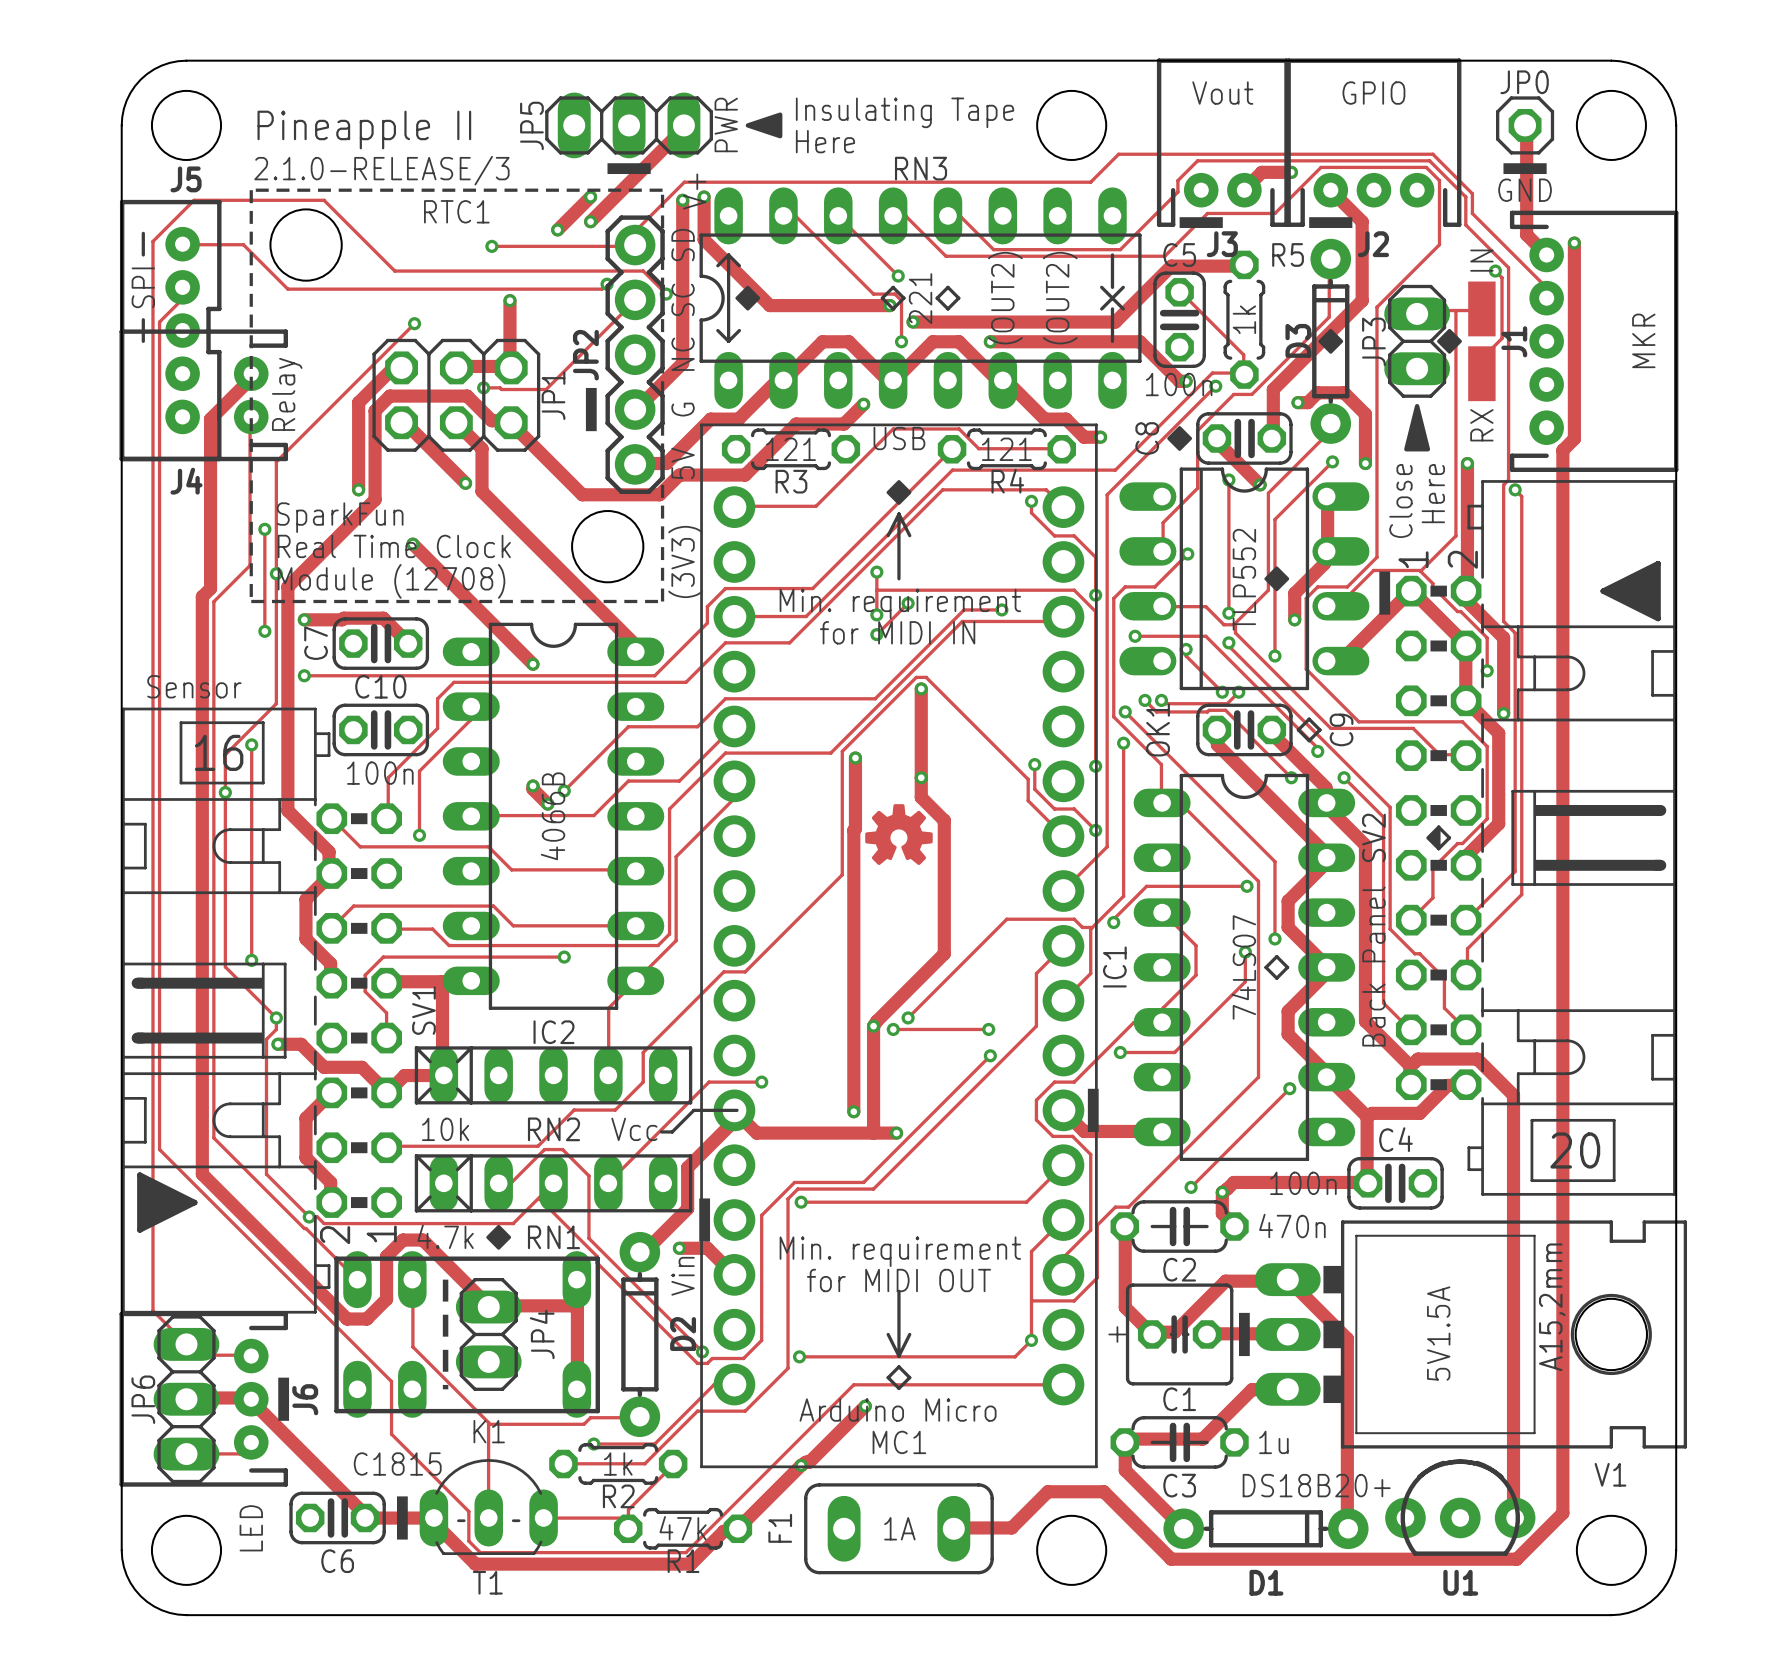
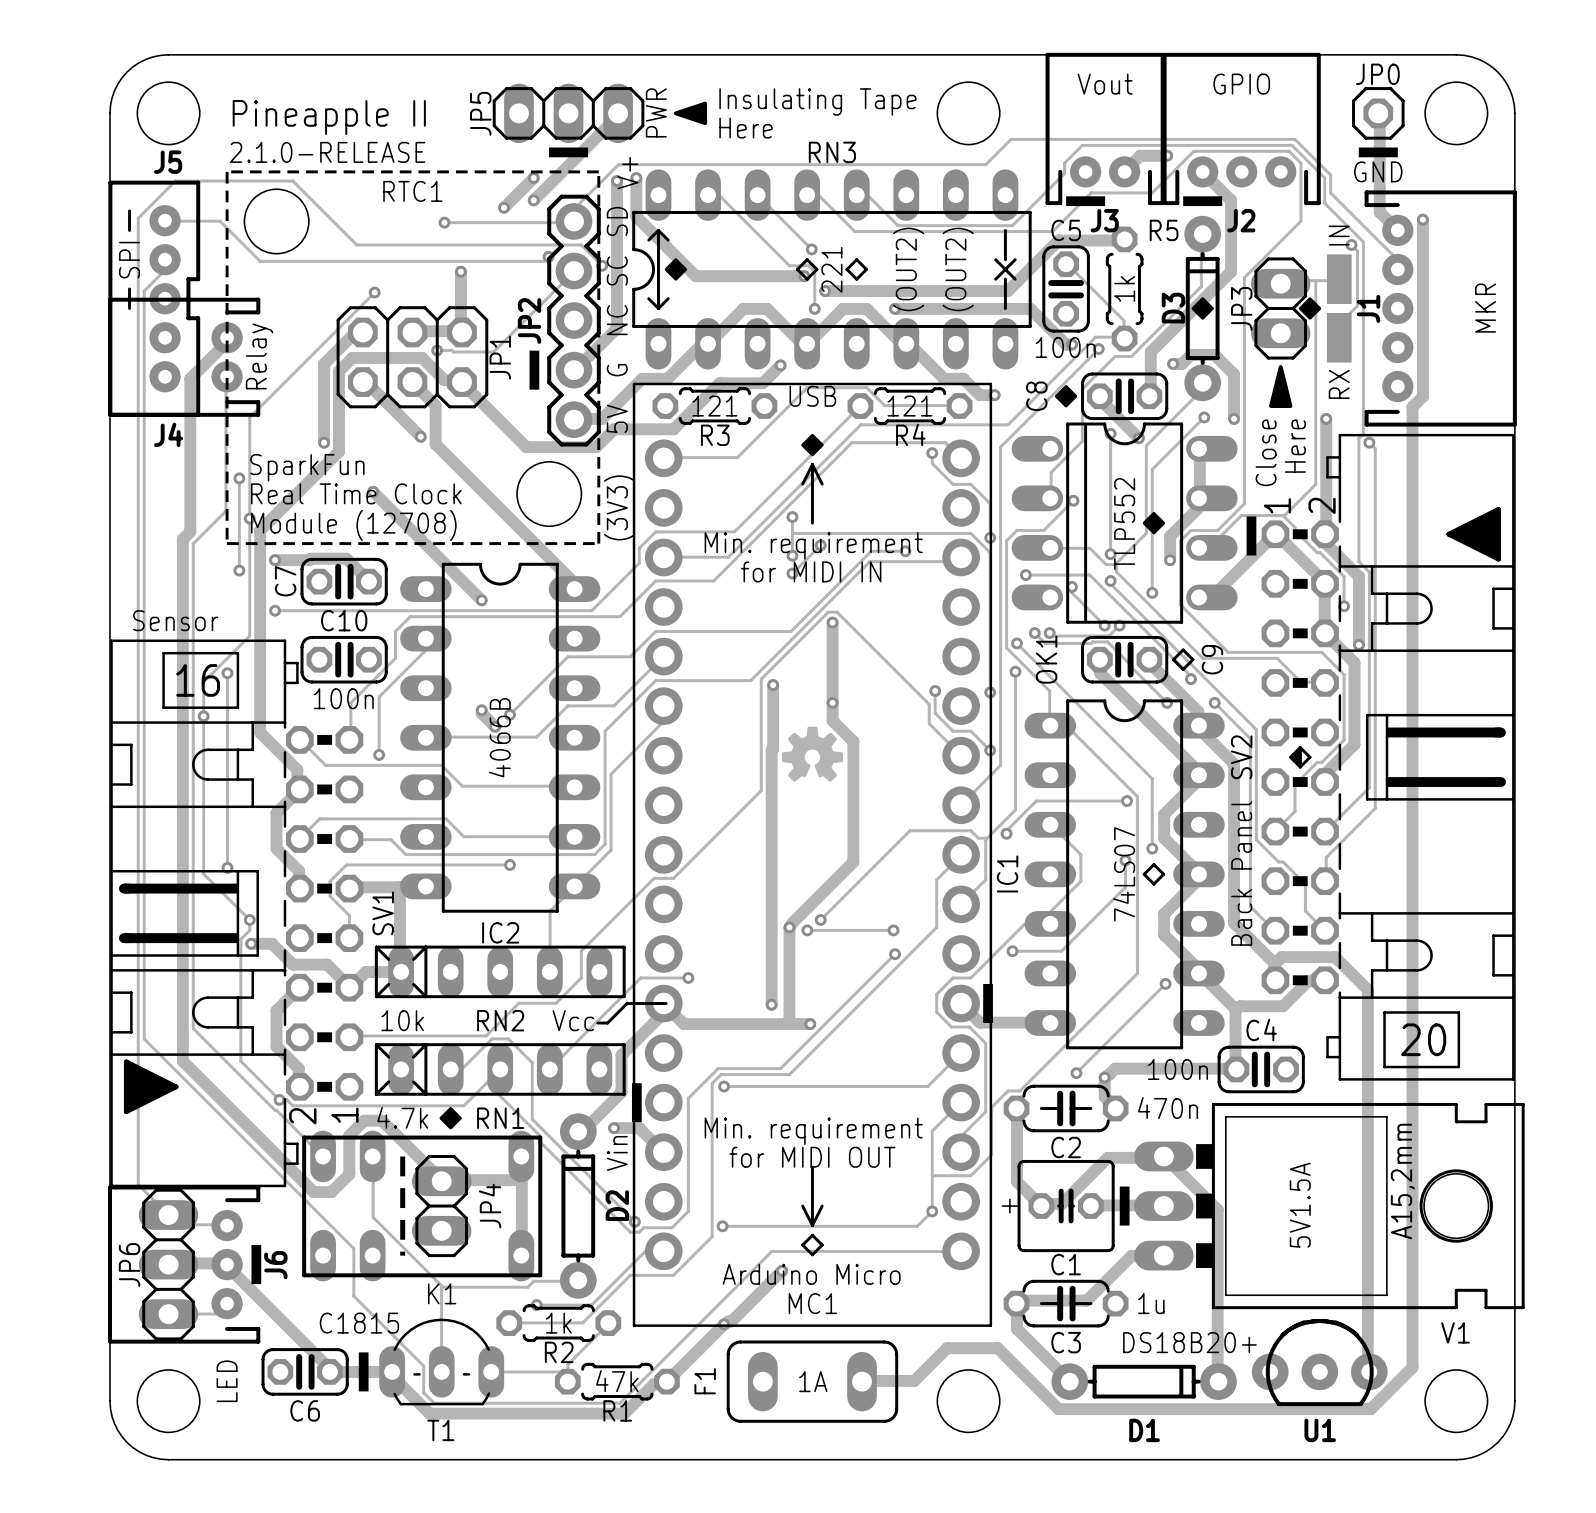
text: 2.1.0-RELEASE/3 (381, 170) -> 2.1.0-RELEASE (327, 152)

